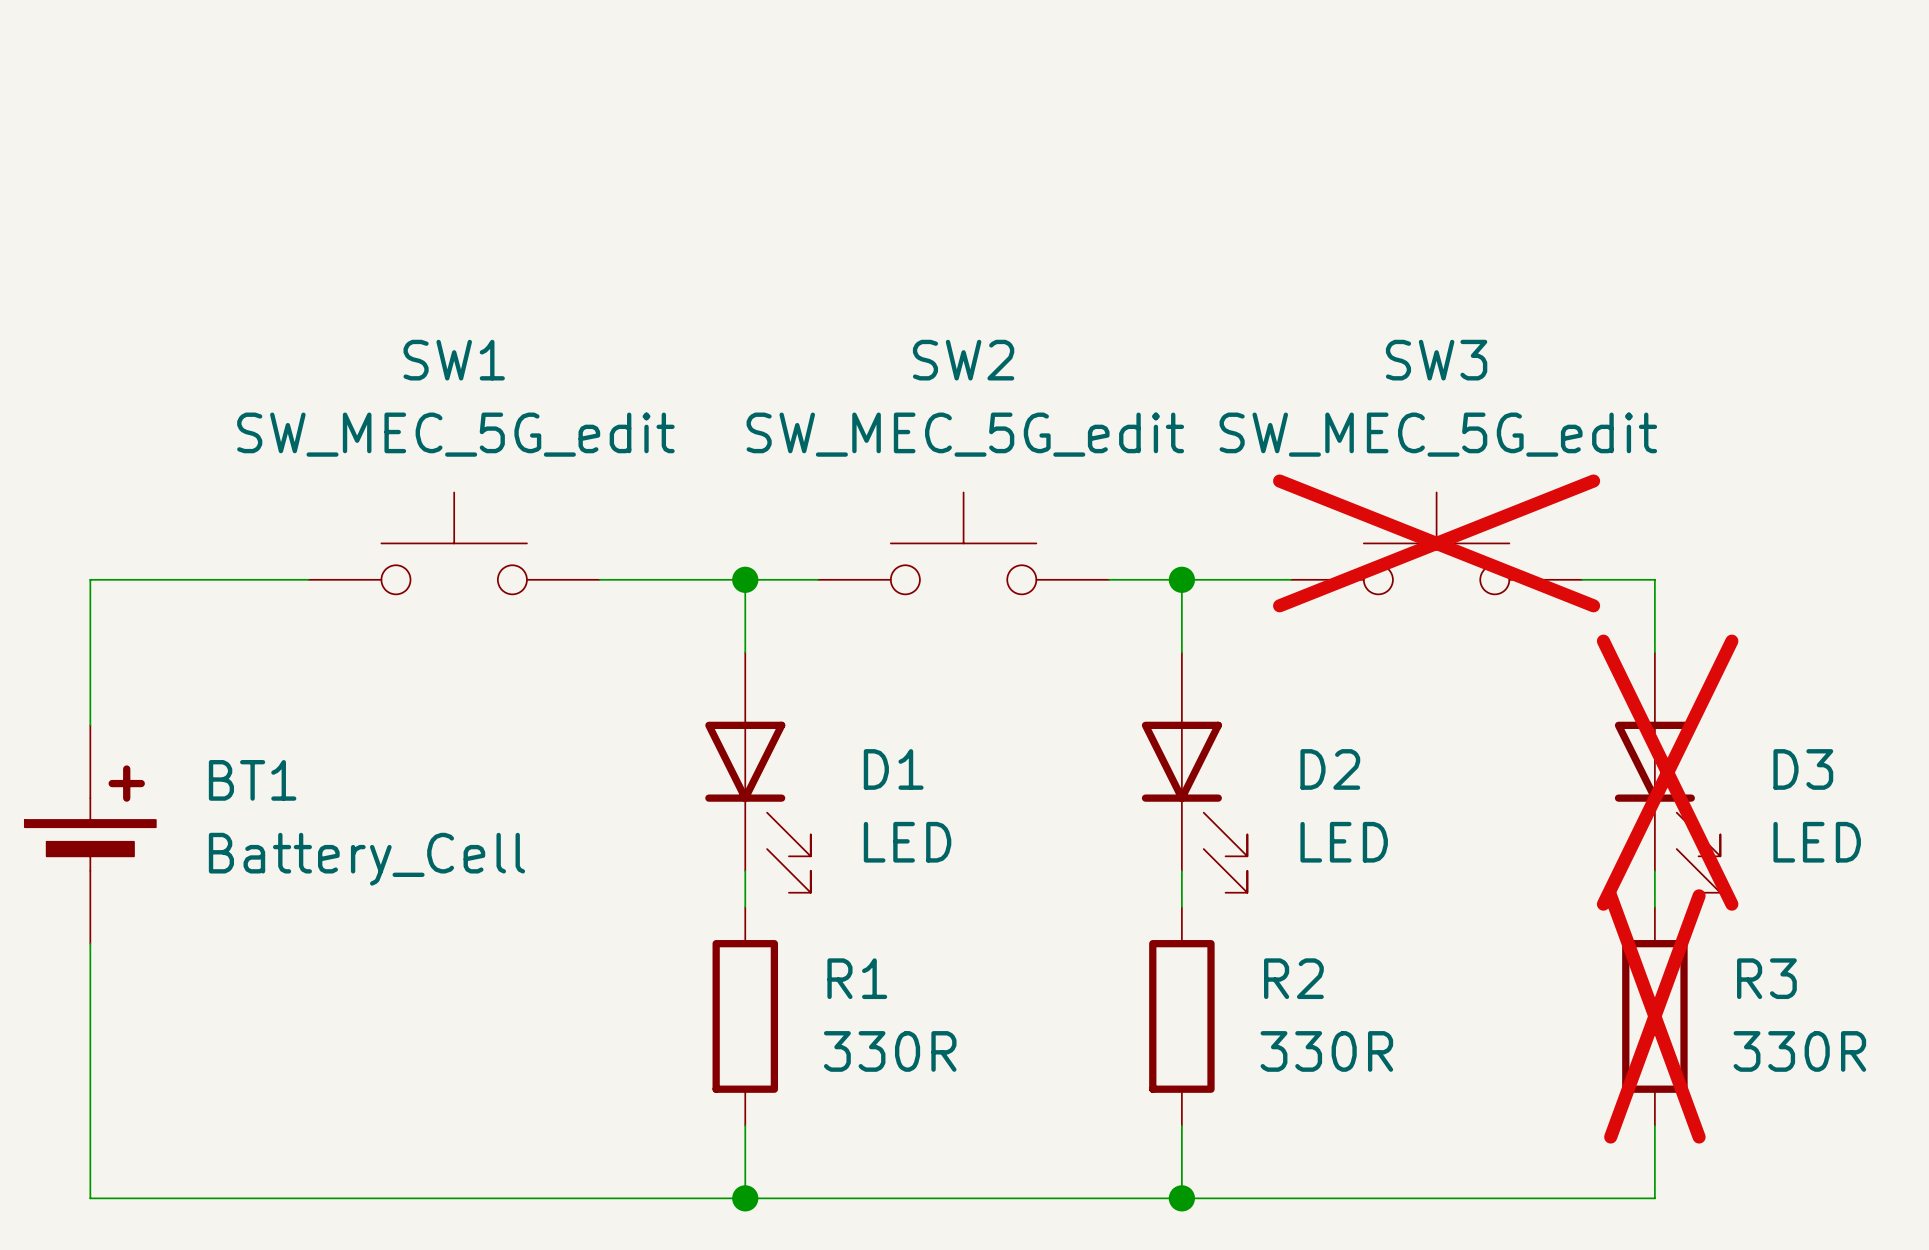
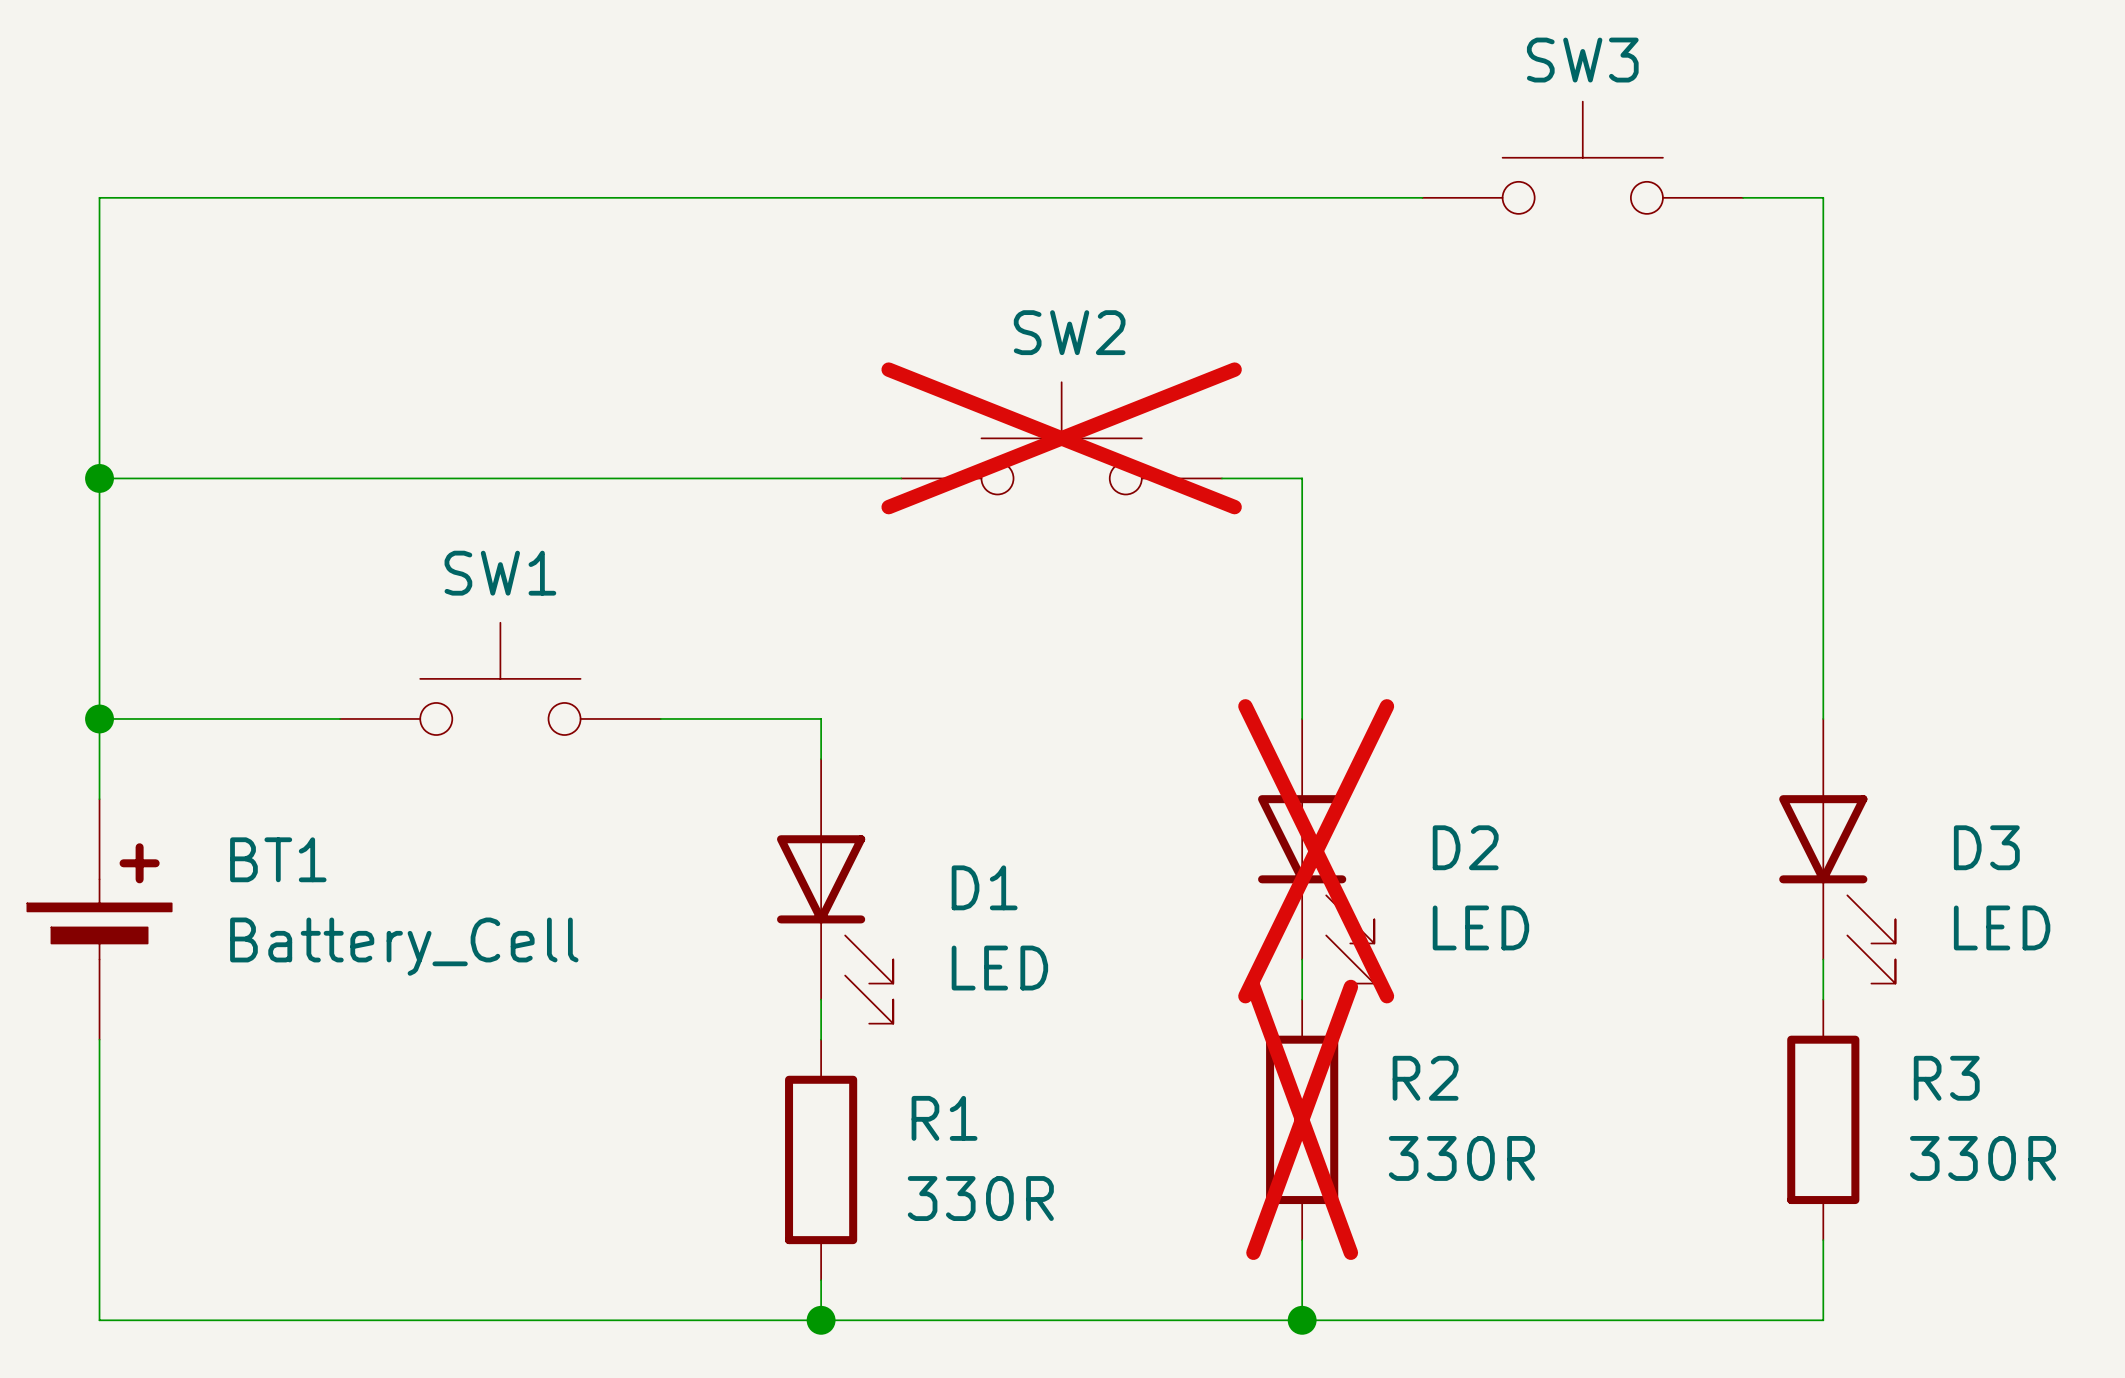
SW1 name position: SW1 (454, 360) -> SW1 (500, 573)
SW2 name position: SW2 (963, 360) -> SW2 (1069, 332)
SW3 name position: SW3 (1436, 360) -> SW3 (1582, 60)
SW2 do-not-place cross: none -> (1061, 438)
wire: none -> (99, 478) (901, 478)
junction: none -> (99, 478)
SW1 value: SW_MEC_5G_edit (455, 434) -> none
SW2 value: SW_MEC_5G_edit (965, 434) -> none
wire: none -> (1221, 478) (1302, 478) (1302, 638)
SW3 value: SW_MEC_5G_edit (1438, 434) -> none
SW1 position: (454, 543) -> (500, 678)
SW2 position: (963, 543) -> (1061, 438)
SW3 position: (1436, 543) -> (1582, 157)
SW3 do-not-place cross: (1436, 543) -> none
wire: (90, 579) (308, 579) -> (99, 638) (99, 197) (1422, 197)
wire: (599, 579) (818, 579) -> (99, 718) (340, 718)
wire: (745, 579) (745, 652) -> none
junction: (745, 579) -> none
wire: (1109, 579) (1291, 579) -> none
junction: (1181, 579) -> none
wire: (1582, 579) (1654, 579) -> (1743, 197) (1823, 197) (1823, 638)
junction: none -> (99, 718)
wire: none -> (660, 718) (821, 718) (821, 759)
D1 position: (758, 772) -> (835, 891)
D2 do-not-place cross: none -> (1316, 851)
D3 do-not-place cross: (1667, 772) -> none
R1 position: (745, 1016) -> (821, 1159)
R2 do-not-place cross: none -> (1302, 1119)
R3 do-not-place cross: (1654, 1016) -> none

